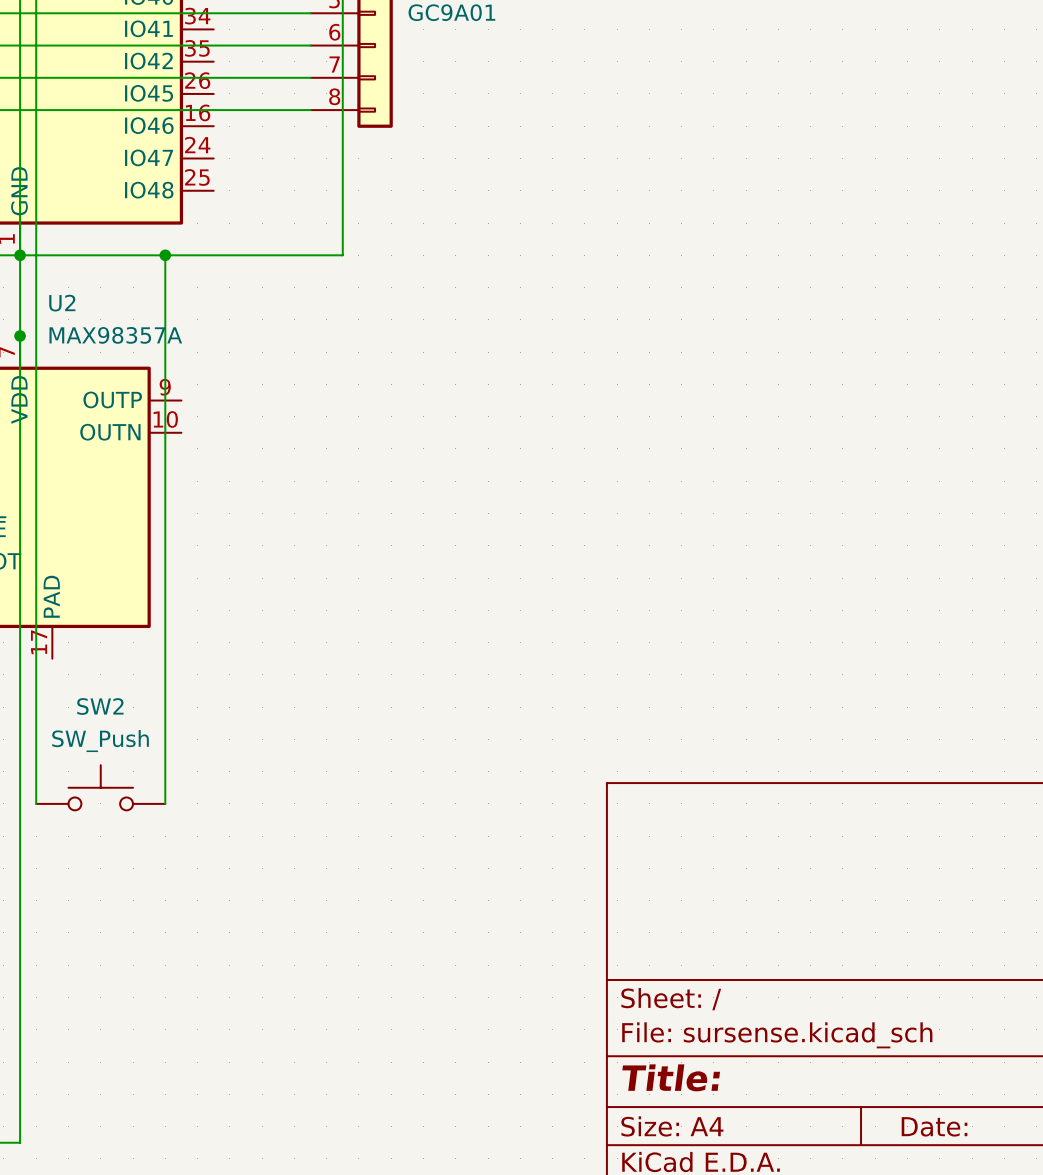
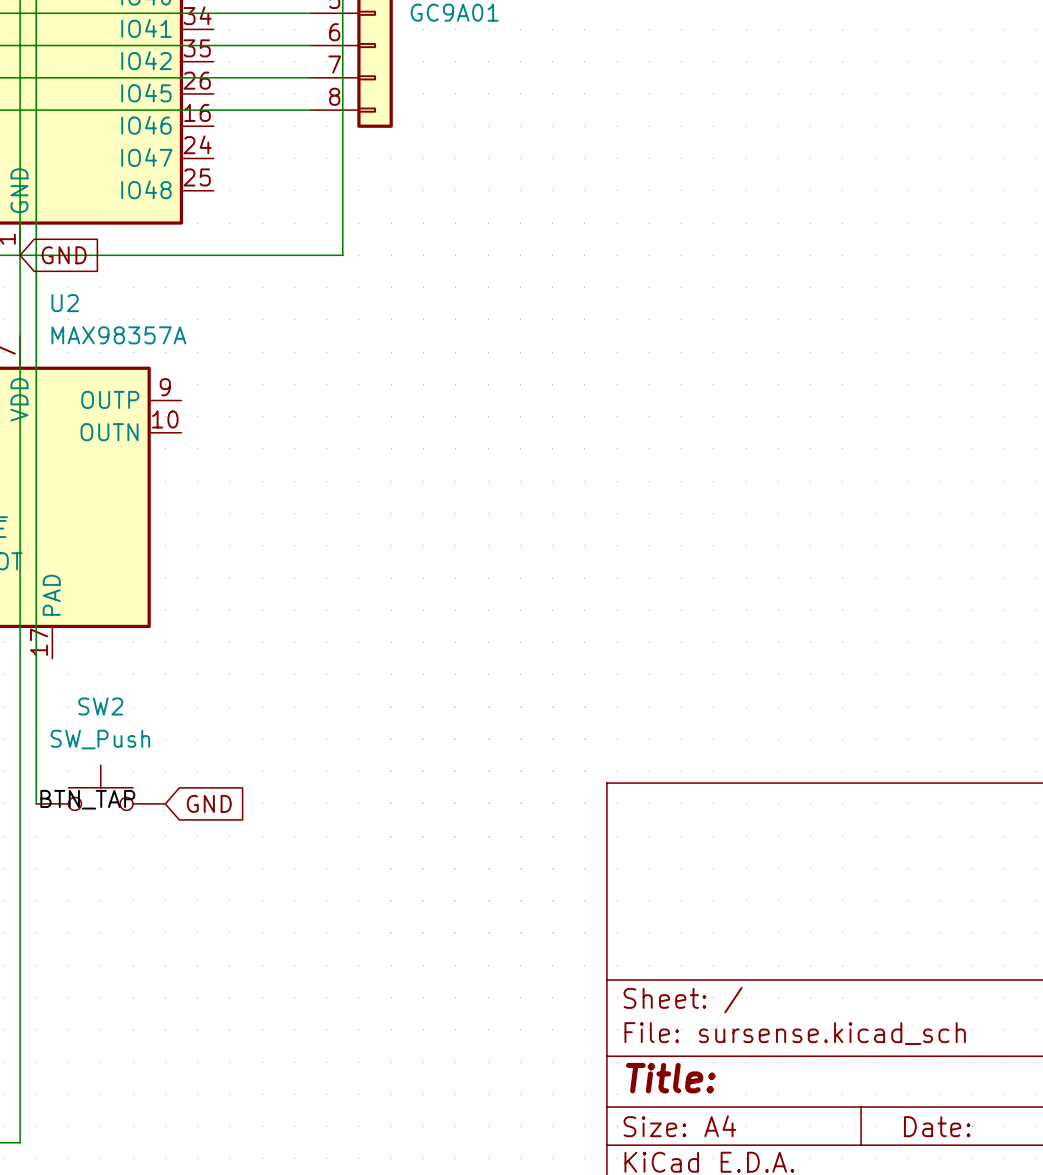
junction: (20, 255) -> none
global label: none -> GND (64, 255)
wire: (165, 255) (165, 803) -> none
junction: (165, 255) -> none
junction: (20, 335) -> none
label: none -> BTN_TAP (87, 799)
global label: none -> GND (209, 803)

